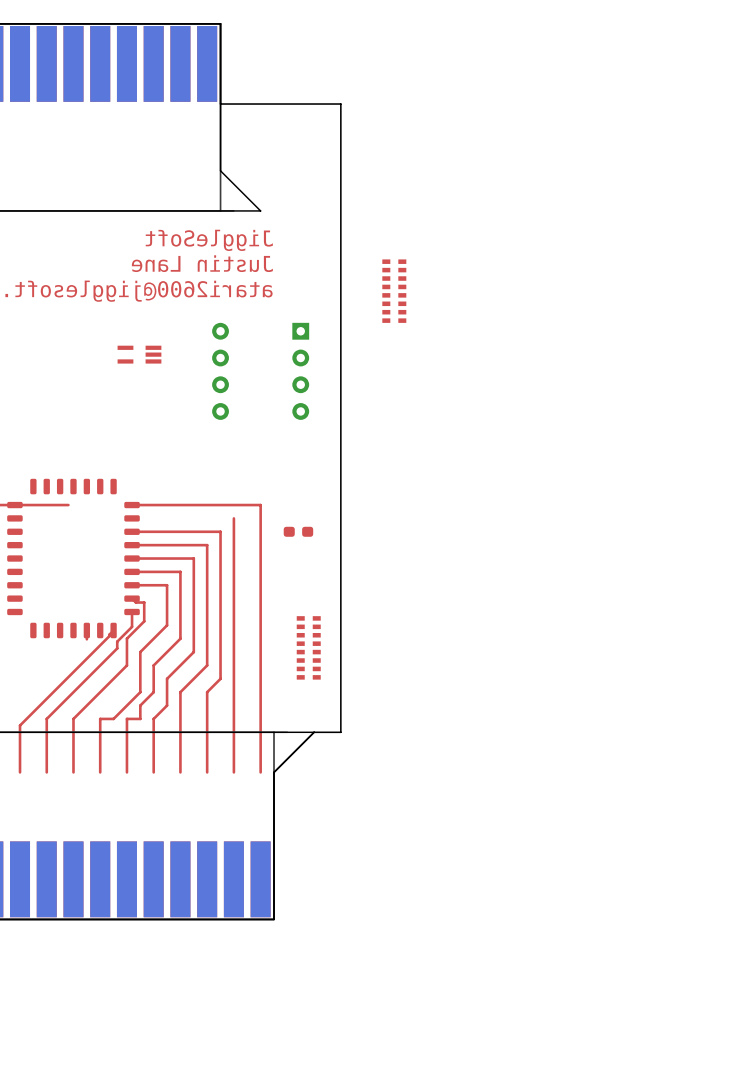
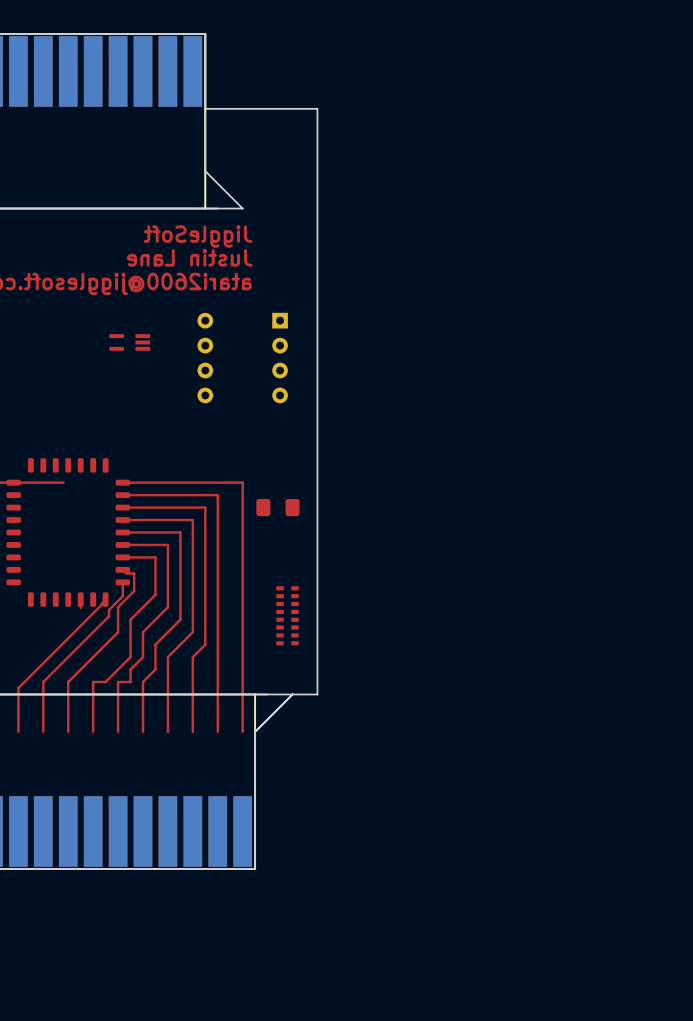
part: (394, 291) -> none
top track: none -> (217, 495) (122, 495)
part footprint: [283, 526, 314, 537] -> [256, 498, 300, 517]

